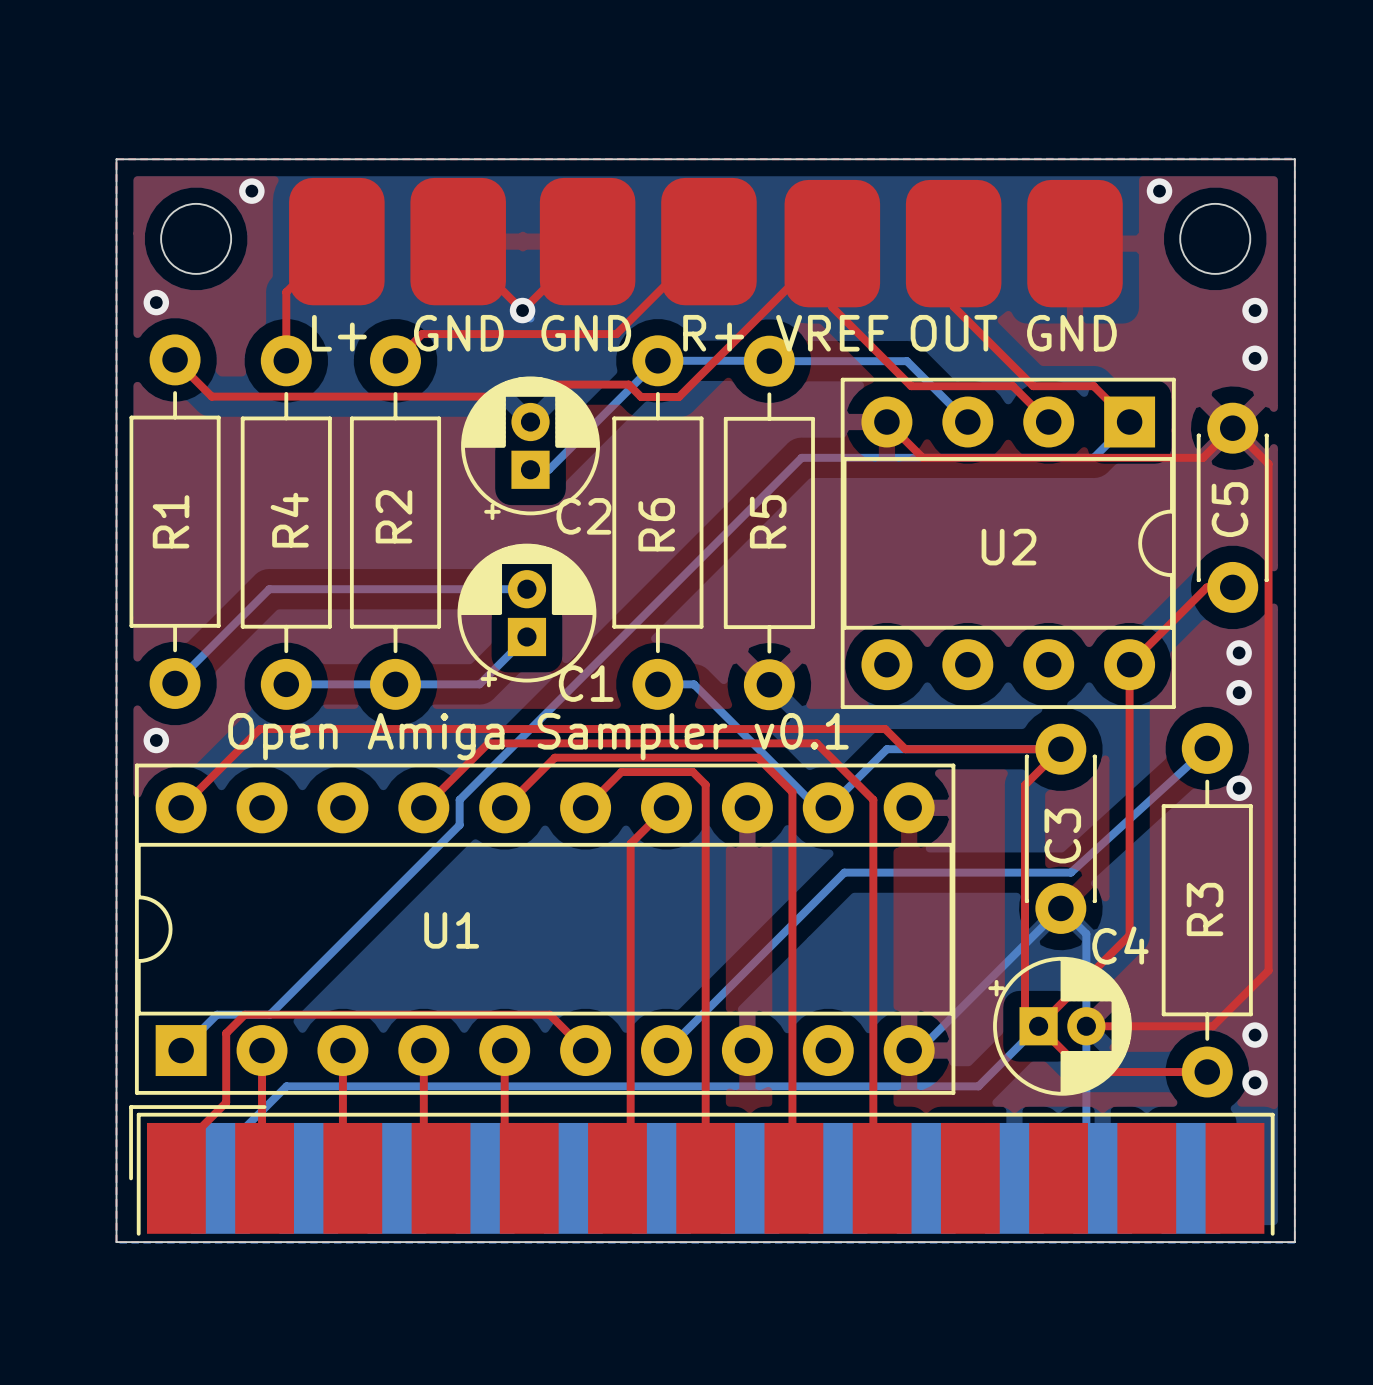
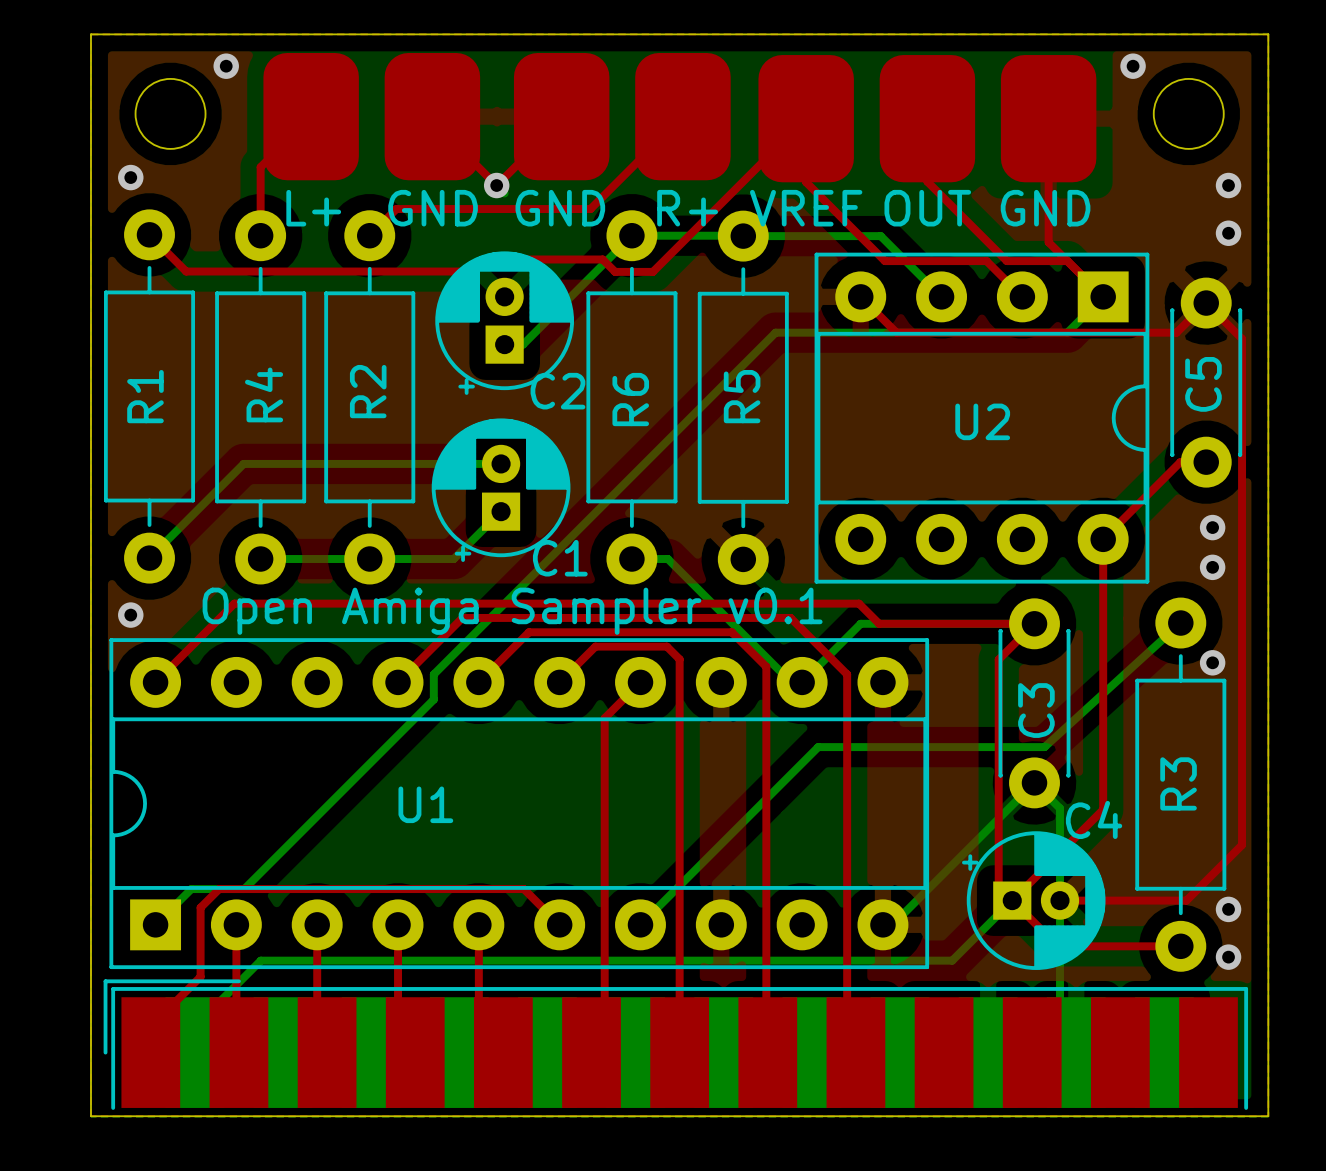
top track: none -> (1048, 118) (1048, 242) (1067, 261)

